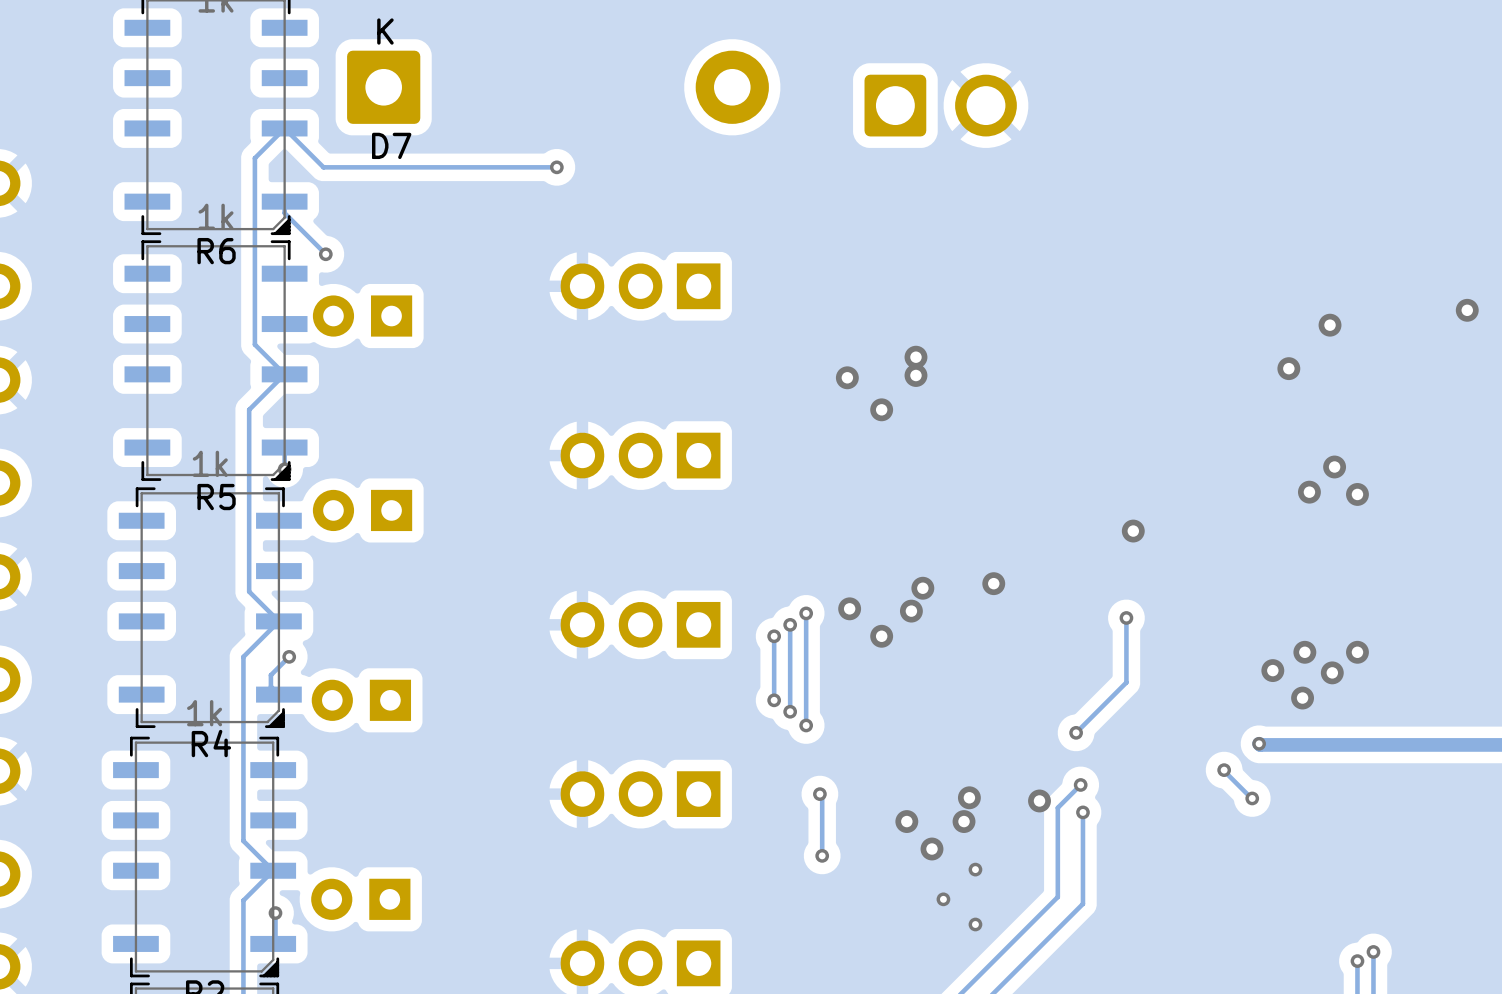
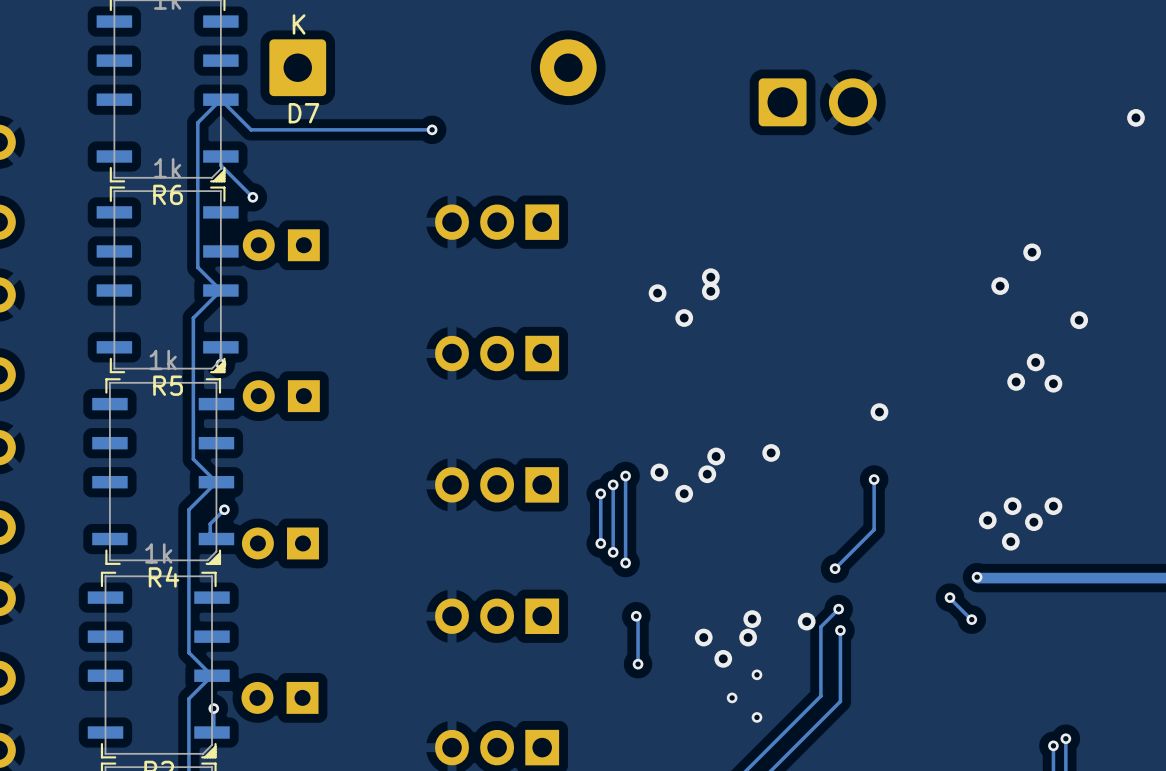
part position: (940, 105) -> (817, 102)
via: none -> (1135, 117)
via: (1467, 310) -> none
via: none -> (1079, 320)

